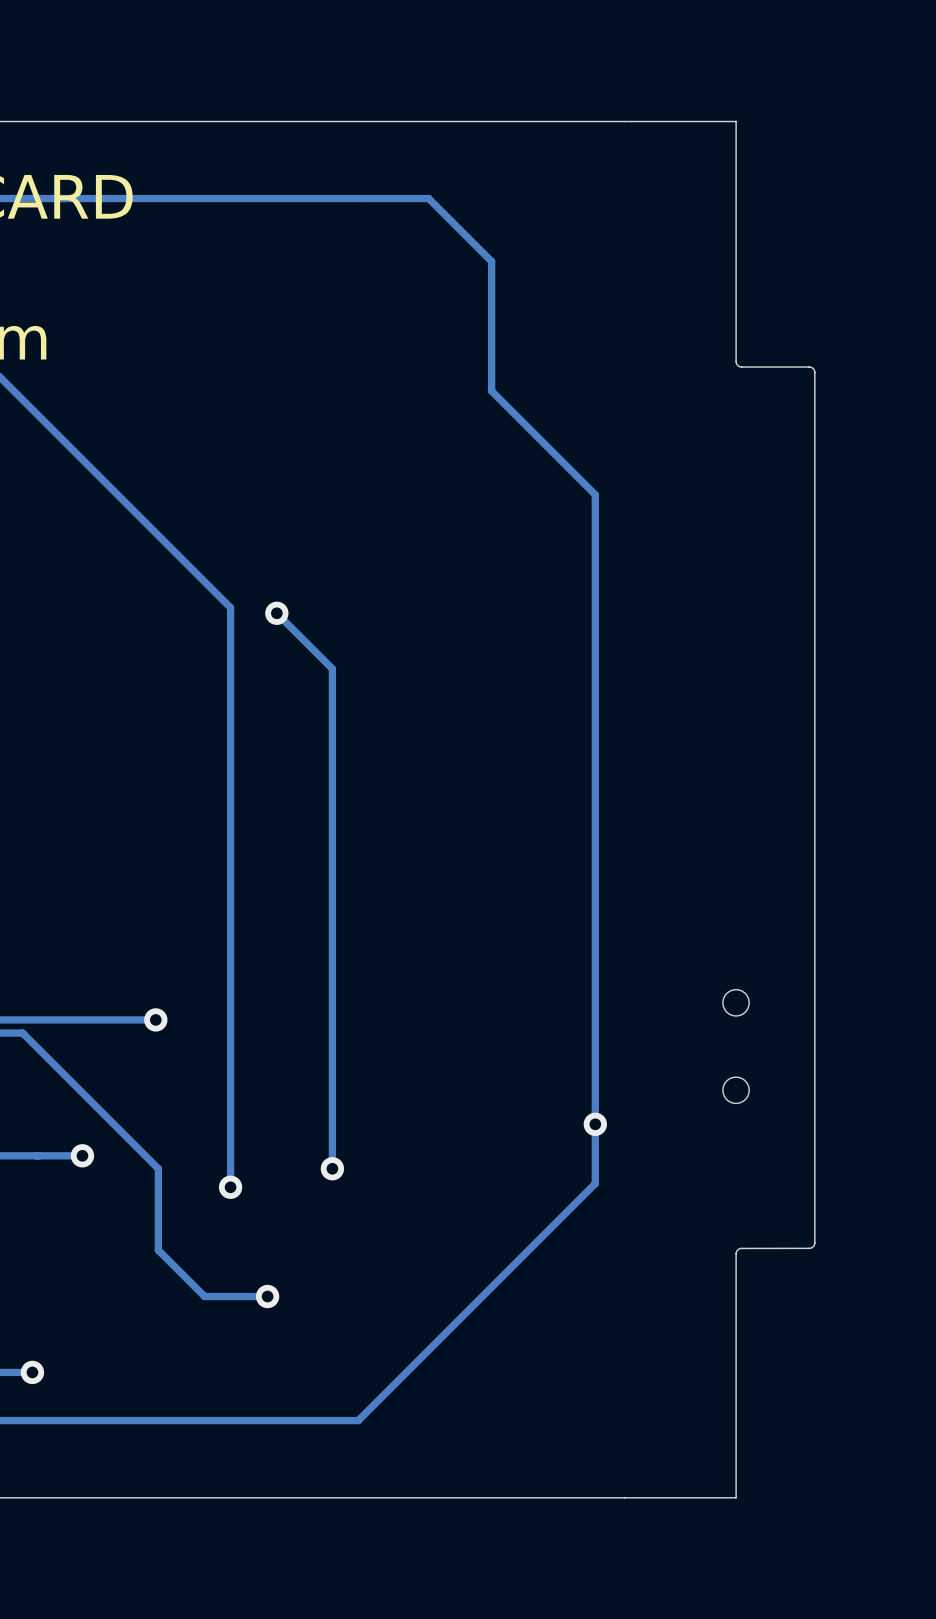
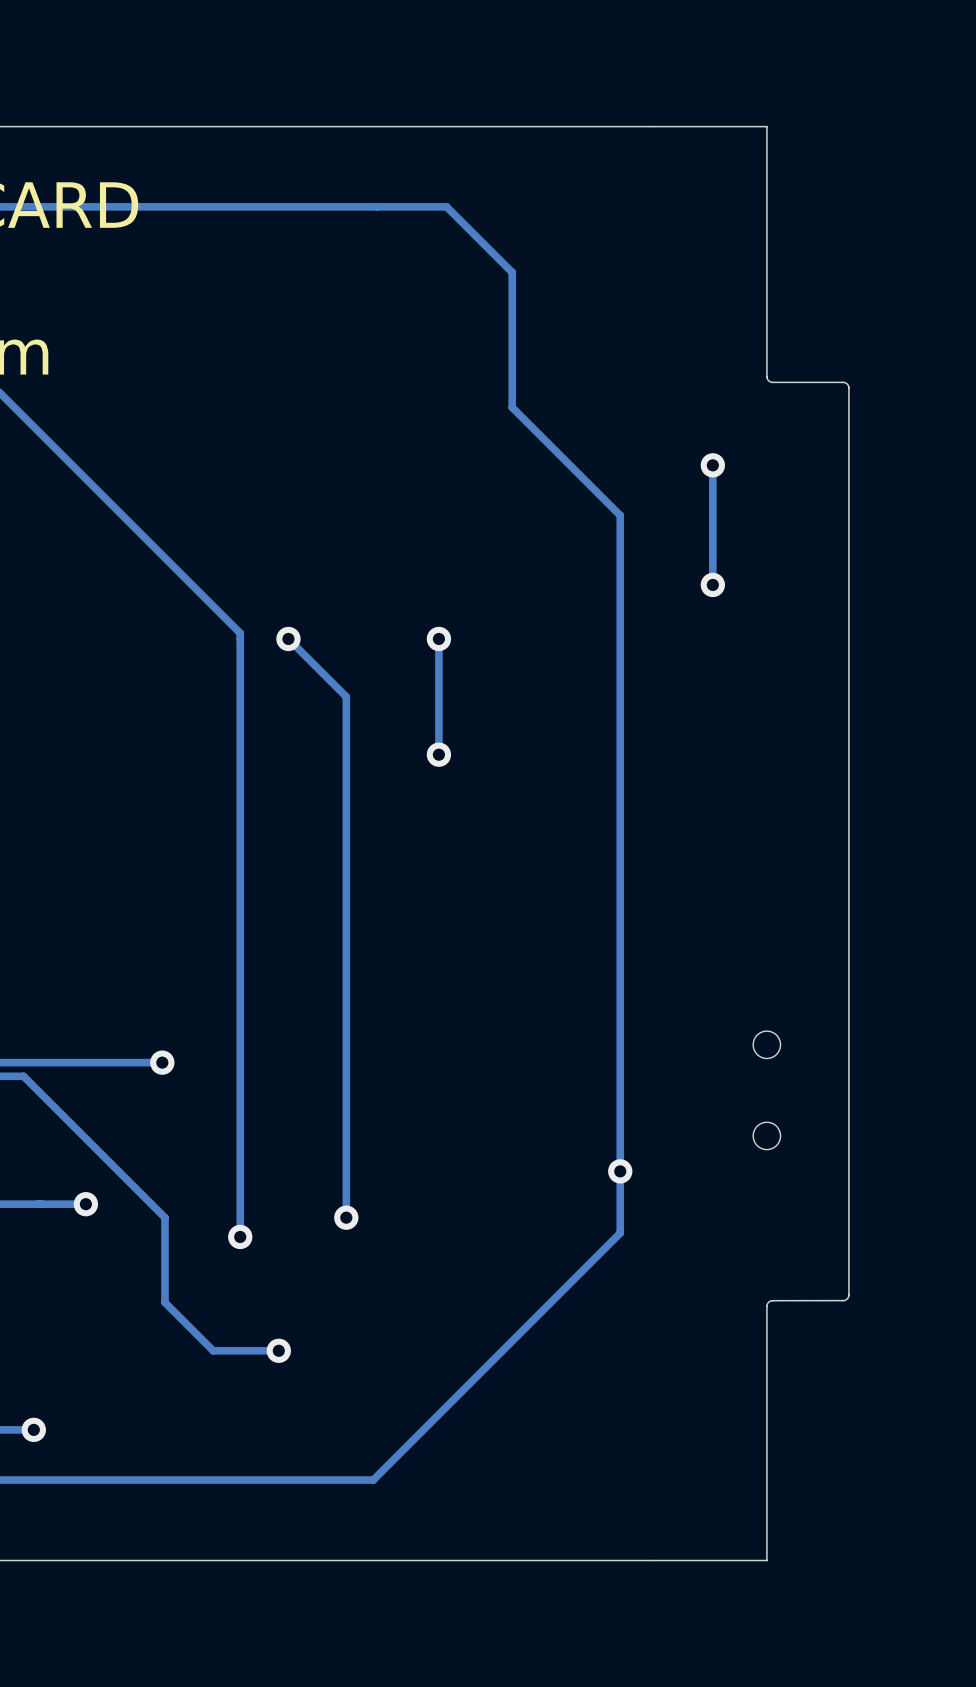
track: none -> (712, 465) (712, 584)
via: none -> (712, 465)
via: none -> (712, 584)
track: none -> (438, 638) (438, 754)
via: none -> (438, 638)
via: none -> (438, 754)

